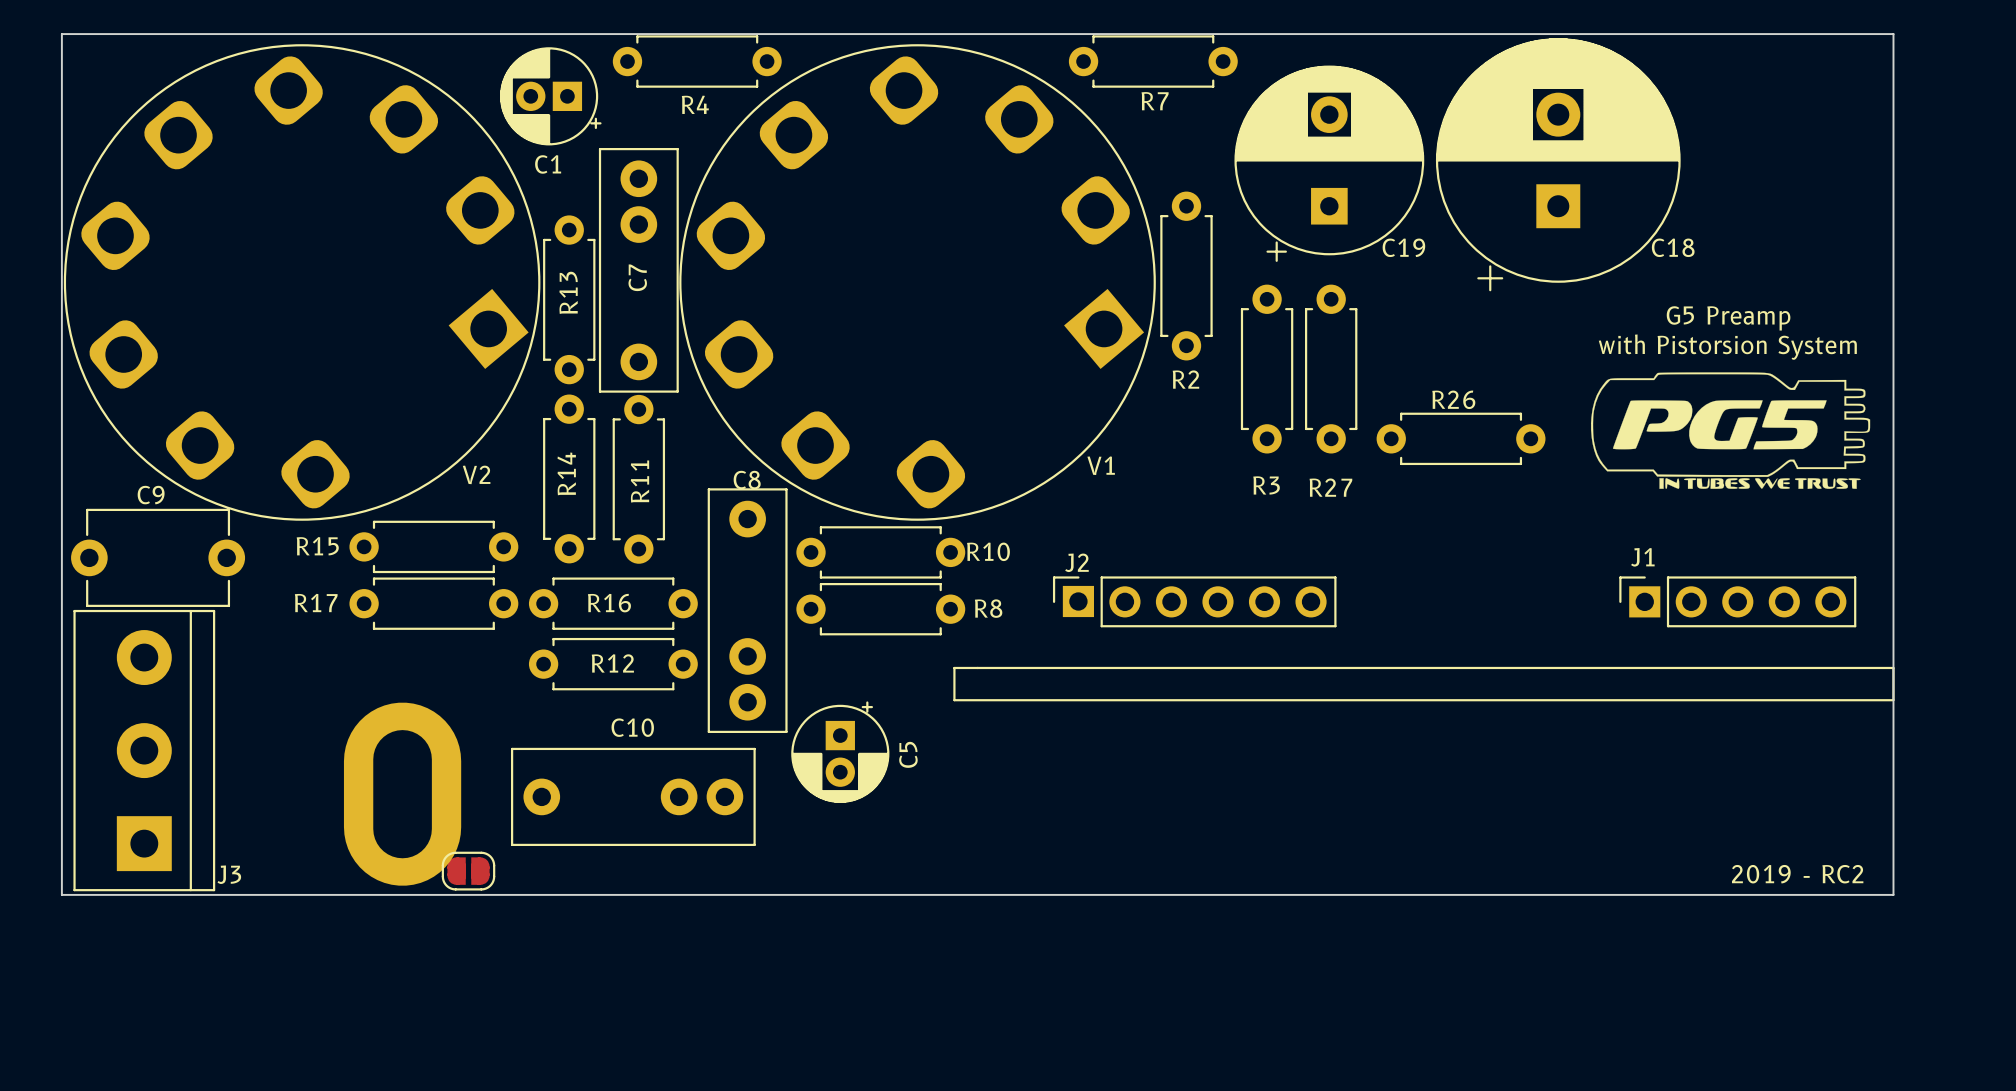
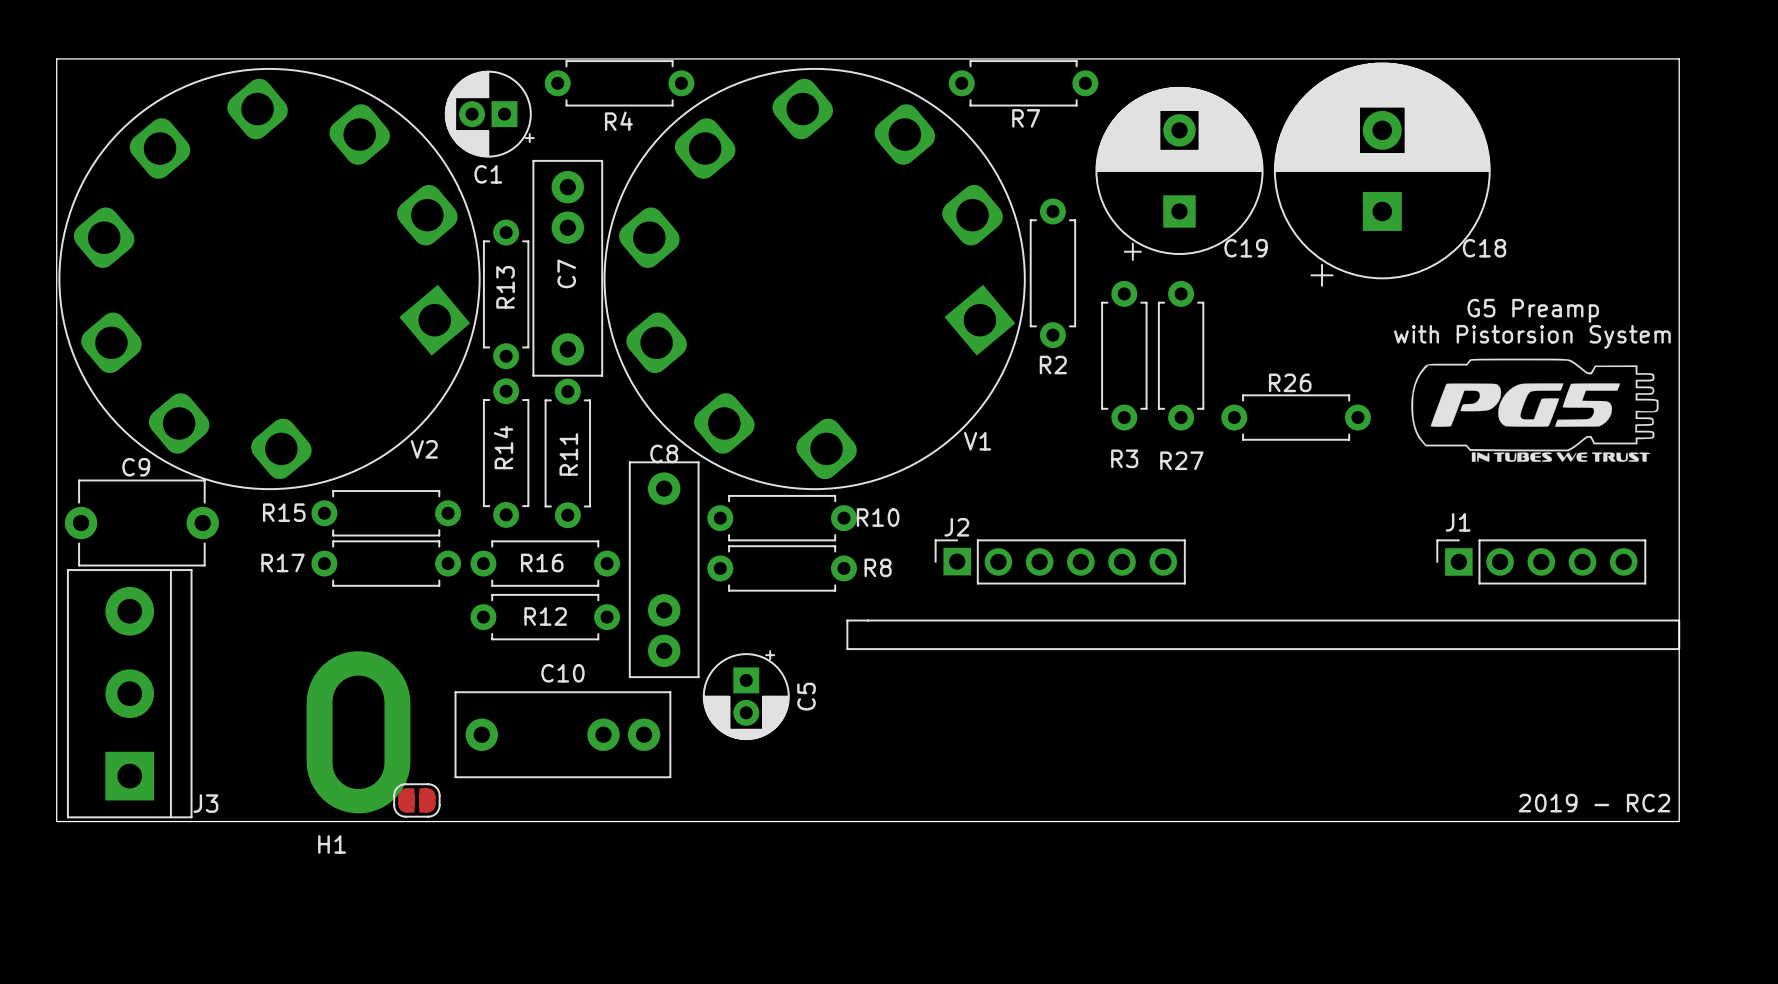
H1 name: none -> H1 (332, 844)

